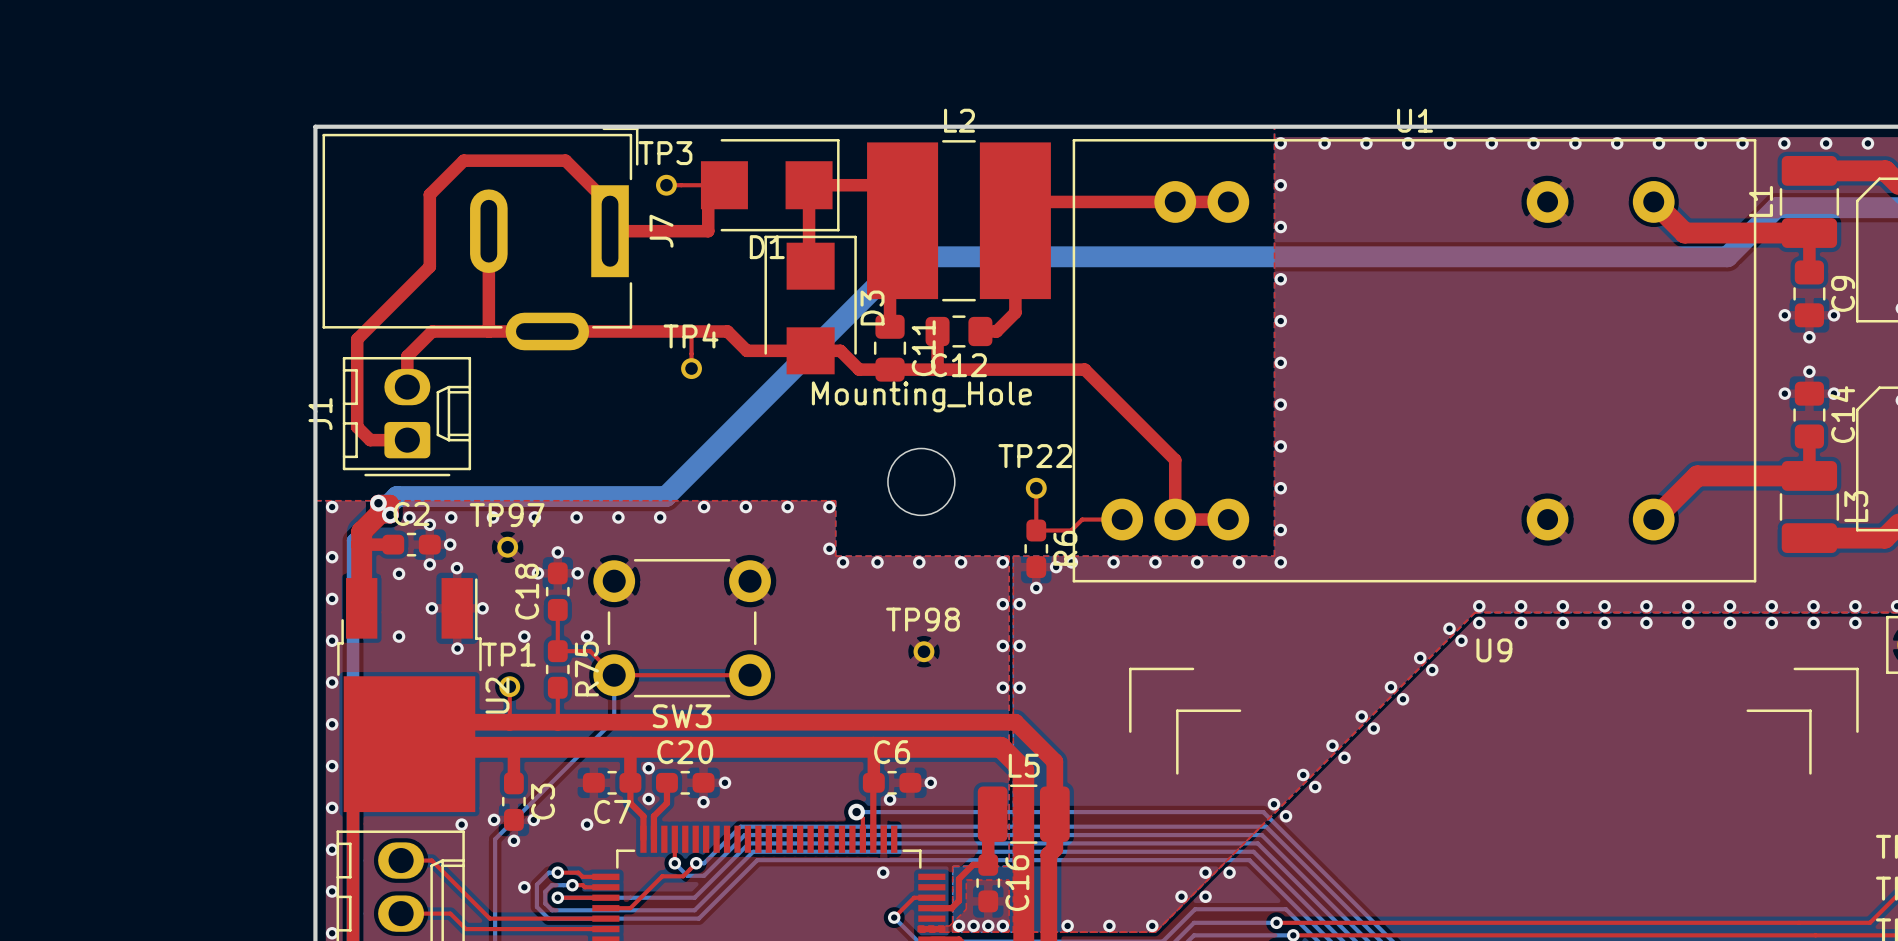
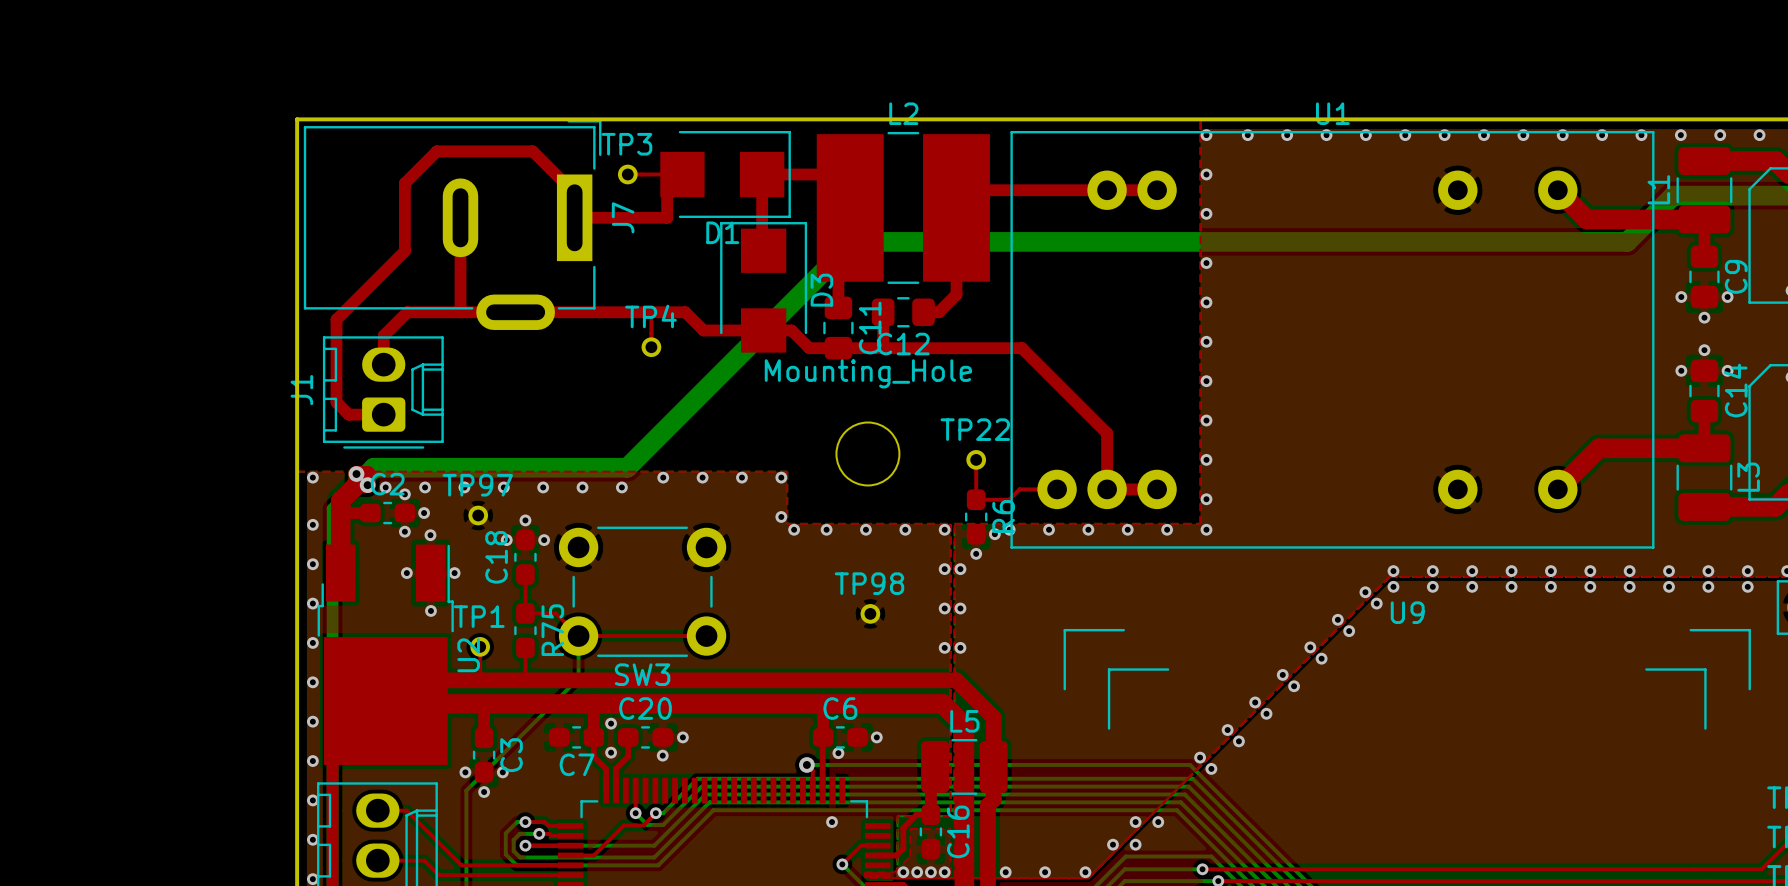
via: (399, 573) -> none
via: (399, 636) -> none
via: (524, 636) -> none
via: (587, 636) -> none
via: (461, 824) -> none
via: (587, 824) -> none
via: (524, 887) -> none

